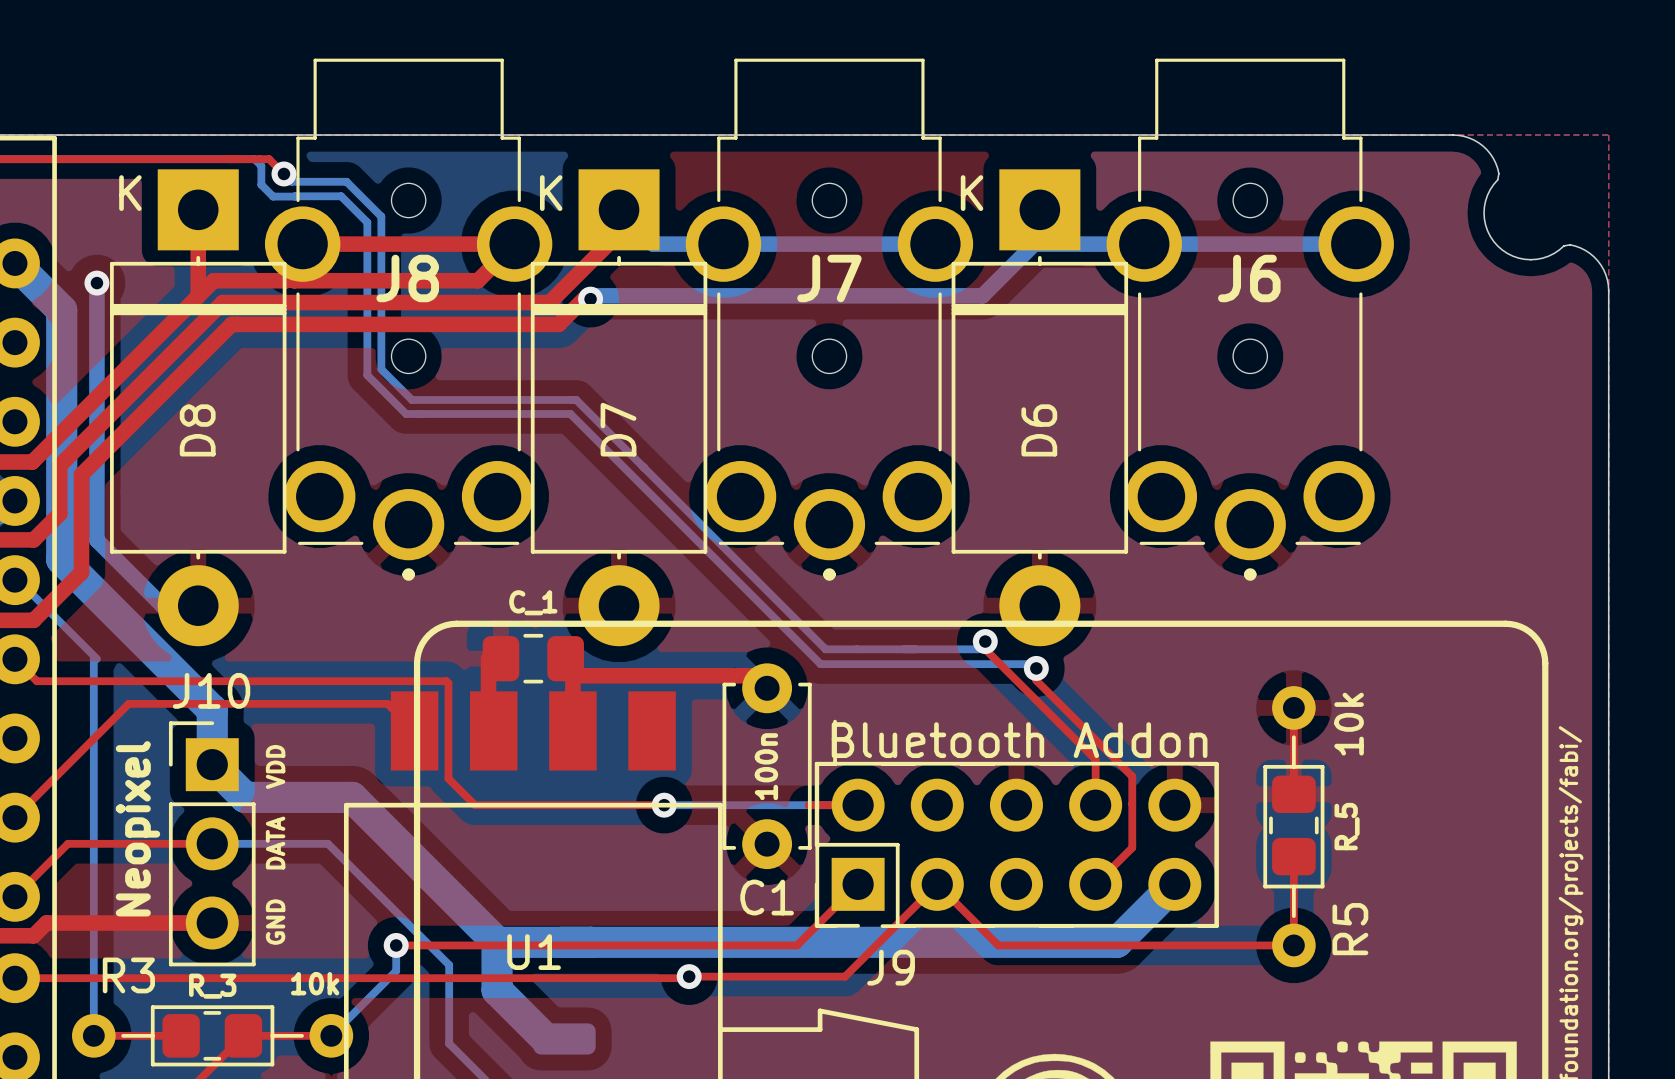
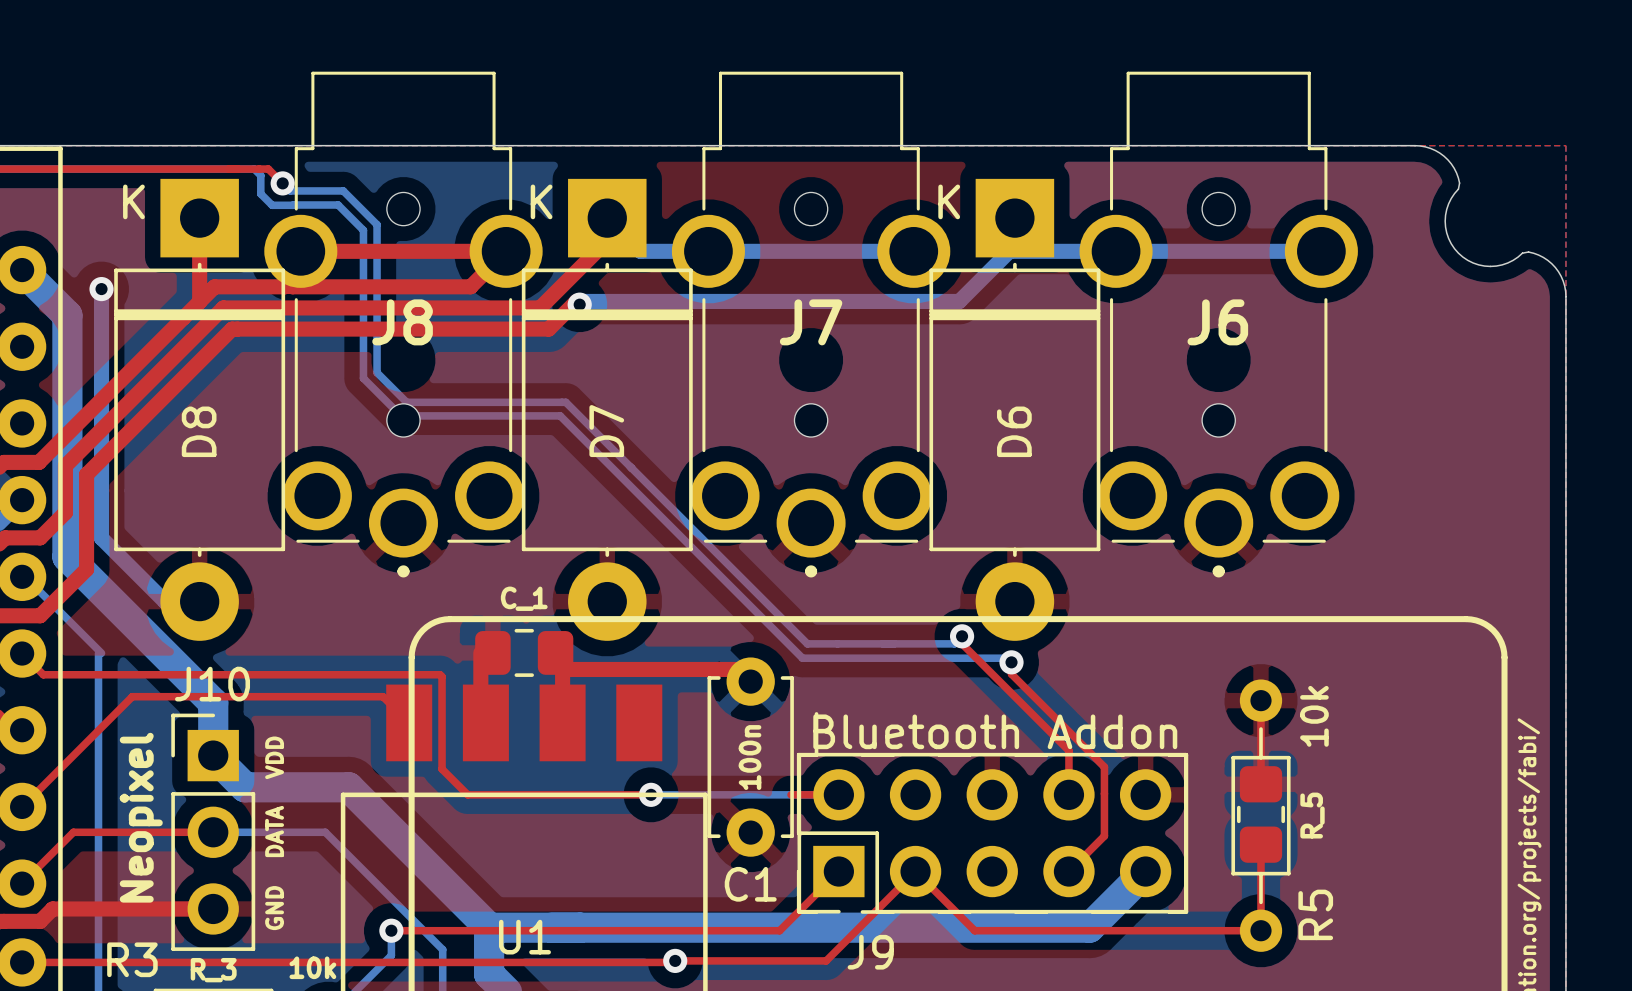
J8 footprint: [264, 58, 553, 581] -> [264, 71, 543, 578]
J7 footprint: [685, 58, 974, 581] -> [671, 71, 951, 578]
J6 footprint: [1106, 58, 1394, 581] -> [1079, 71, 1358, 578]

